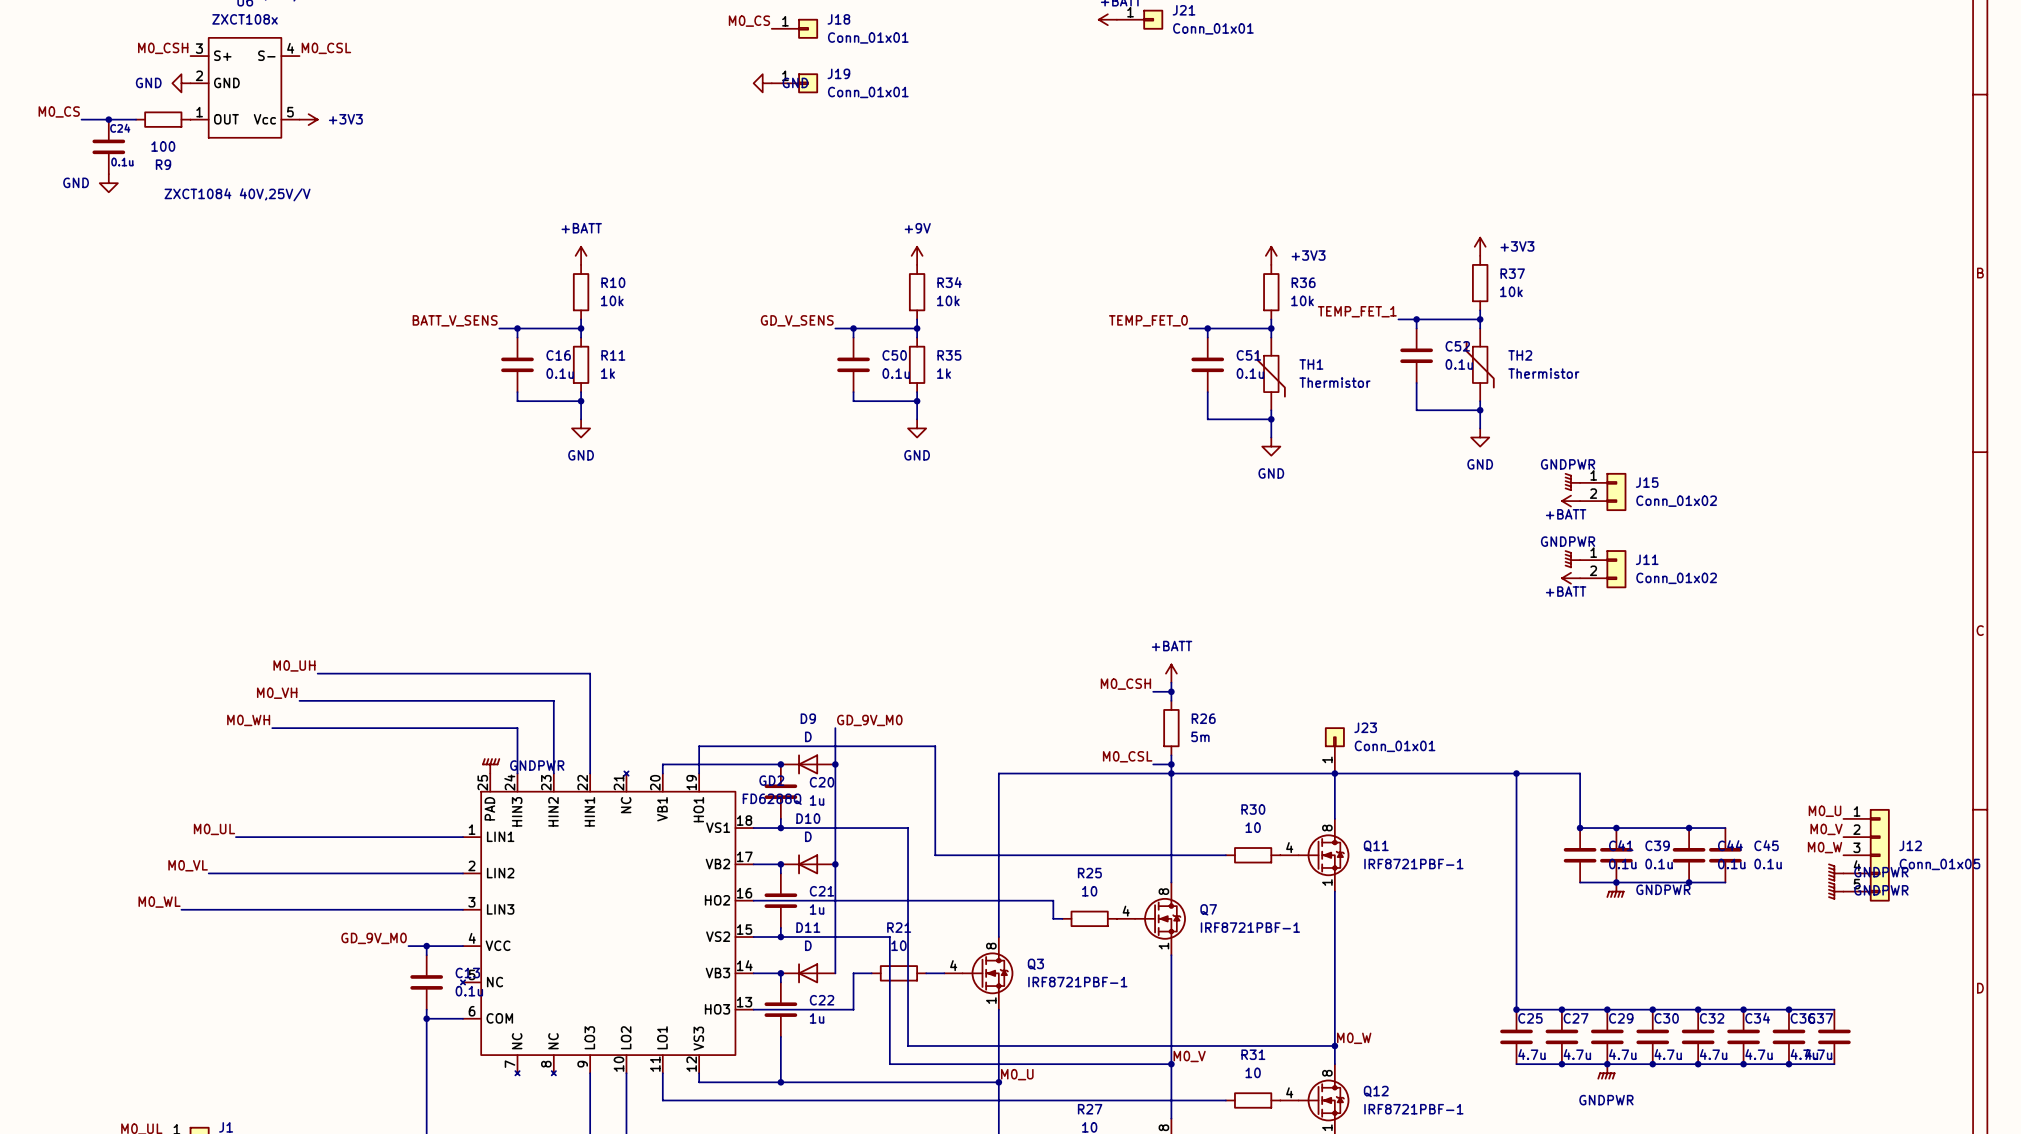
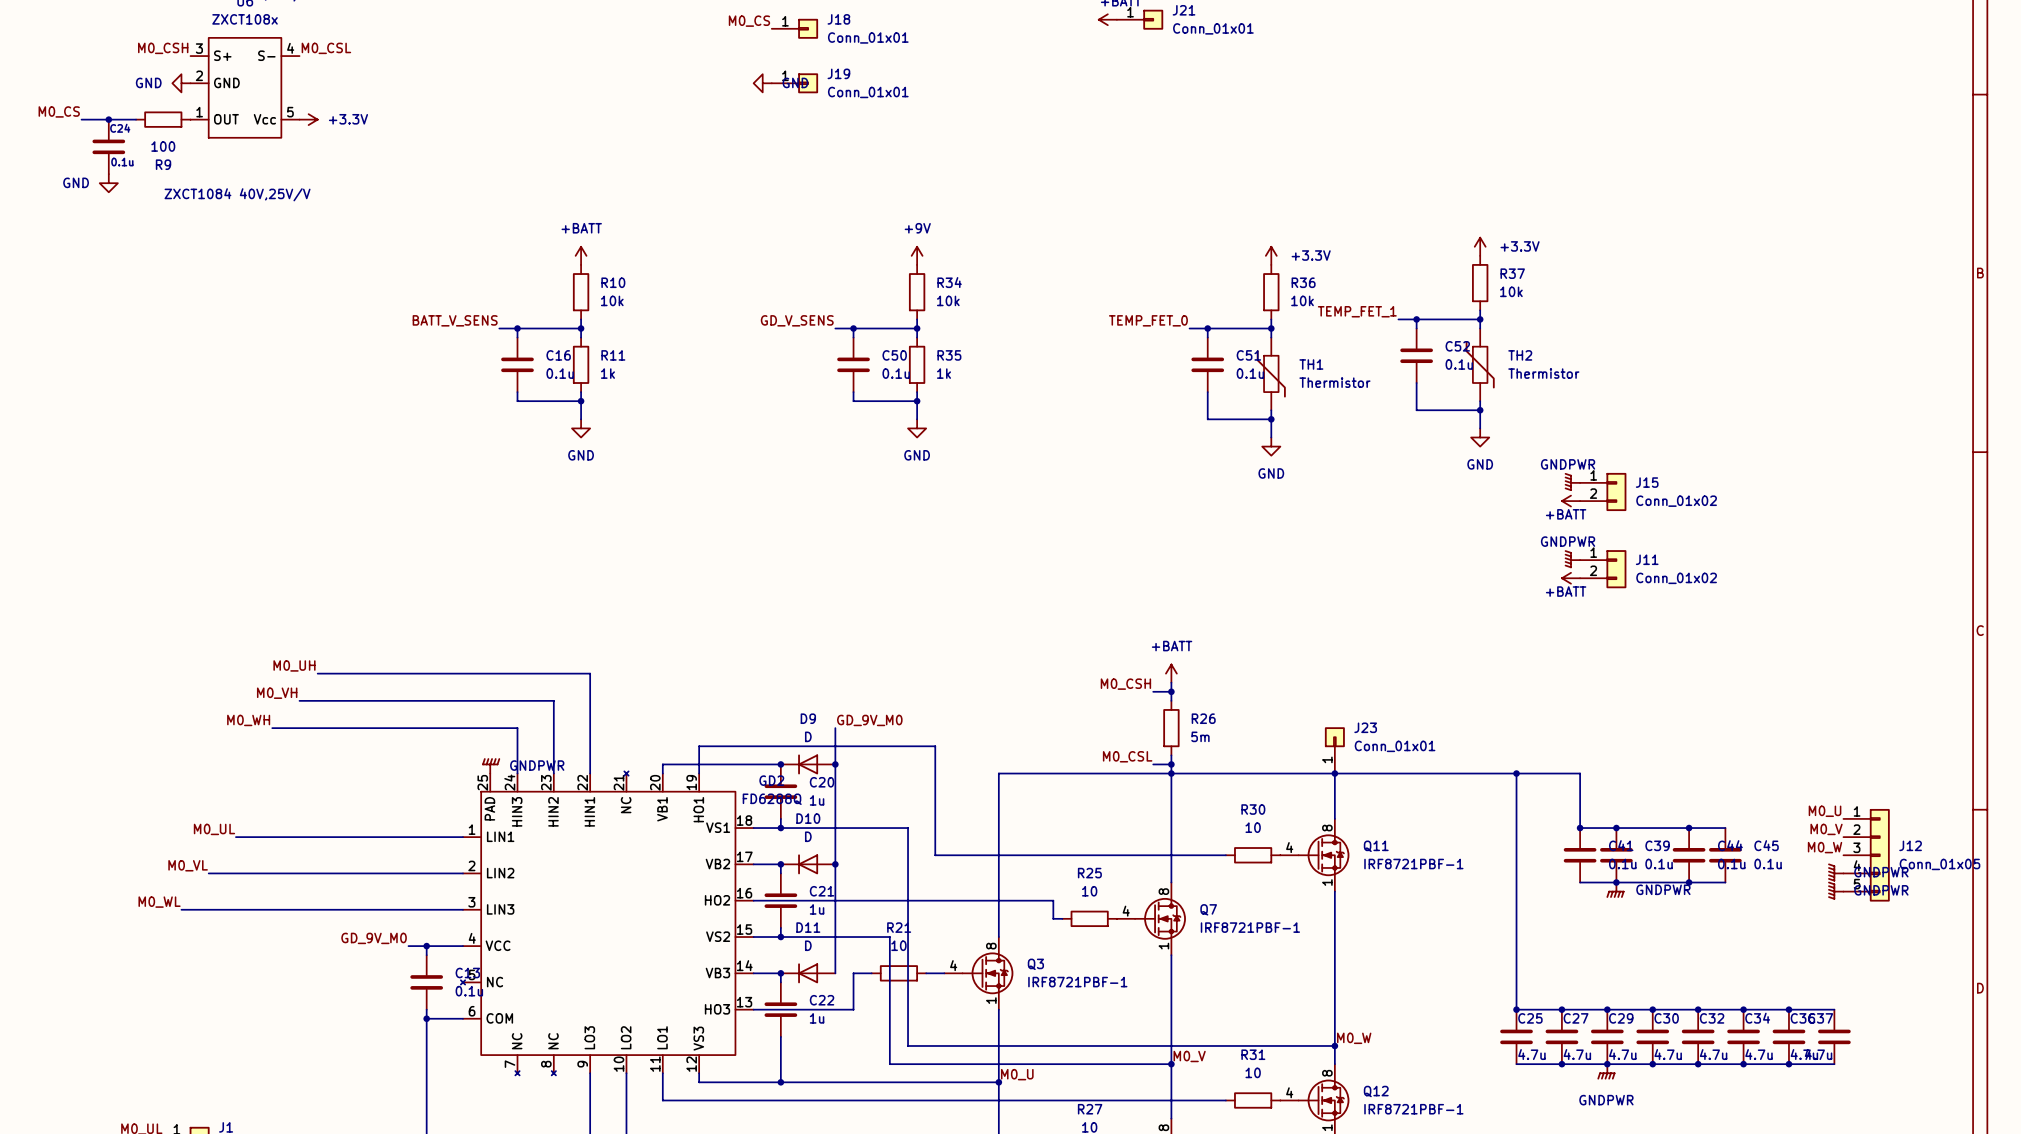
power symbol: +3V3 (308, 119) -> +3.3V (308, 119)
power symbol: +3V3 (1480, 246) -> +3.3V (1480, 246)
power symbol: +3V3 (1271, 255) -> +3.3V (1271, 255)

